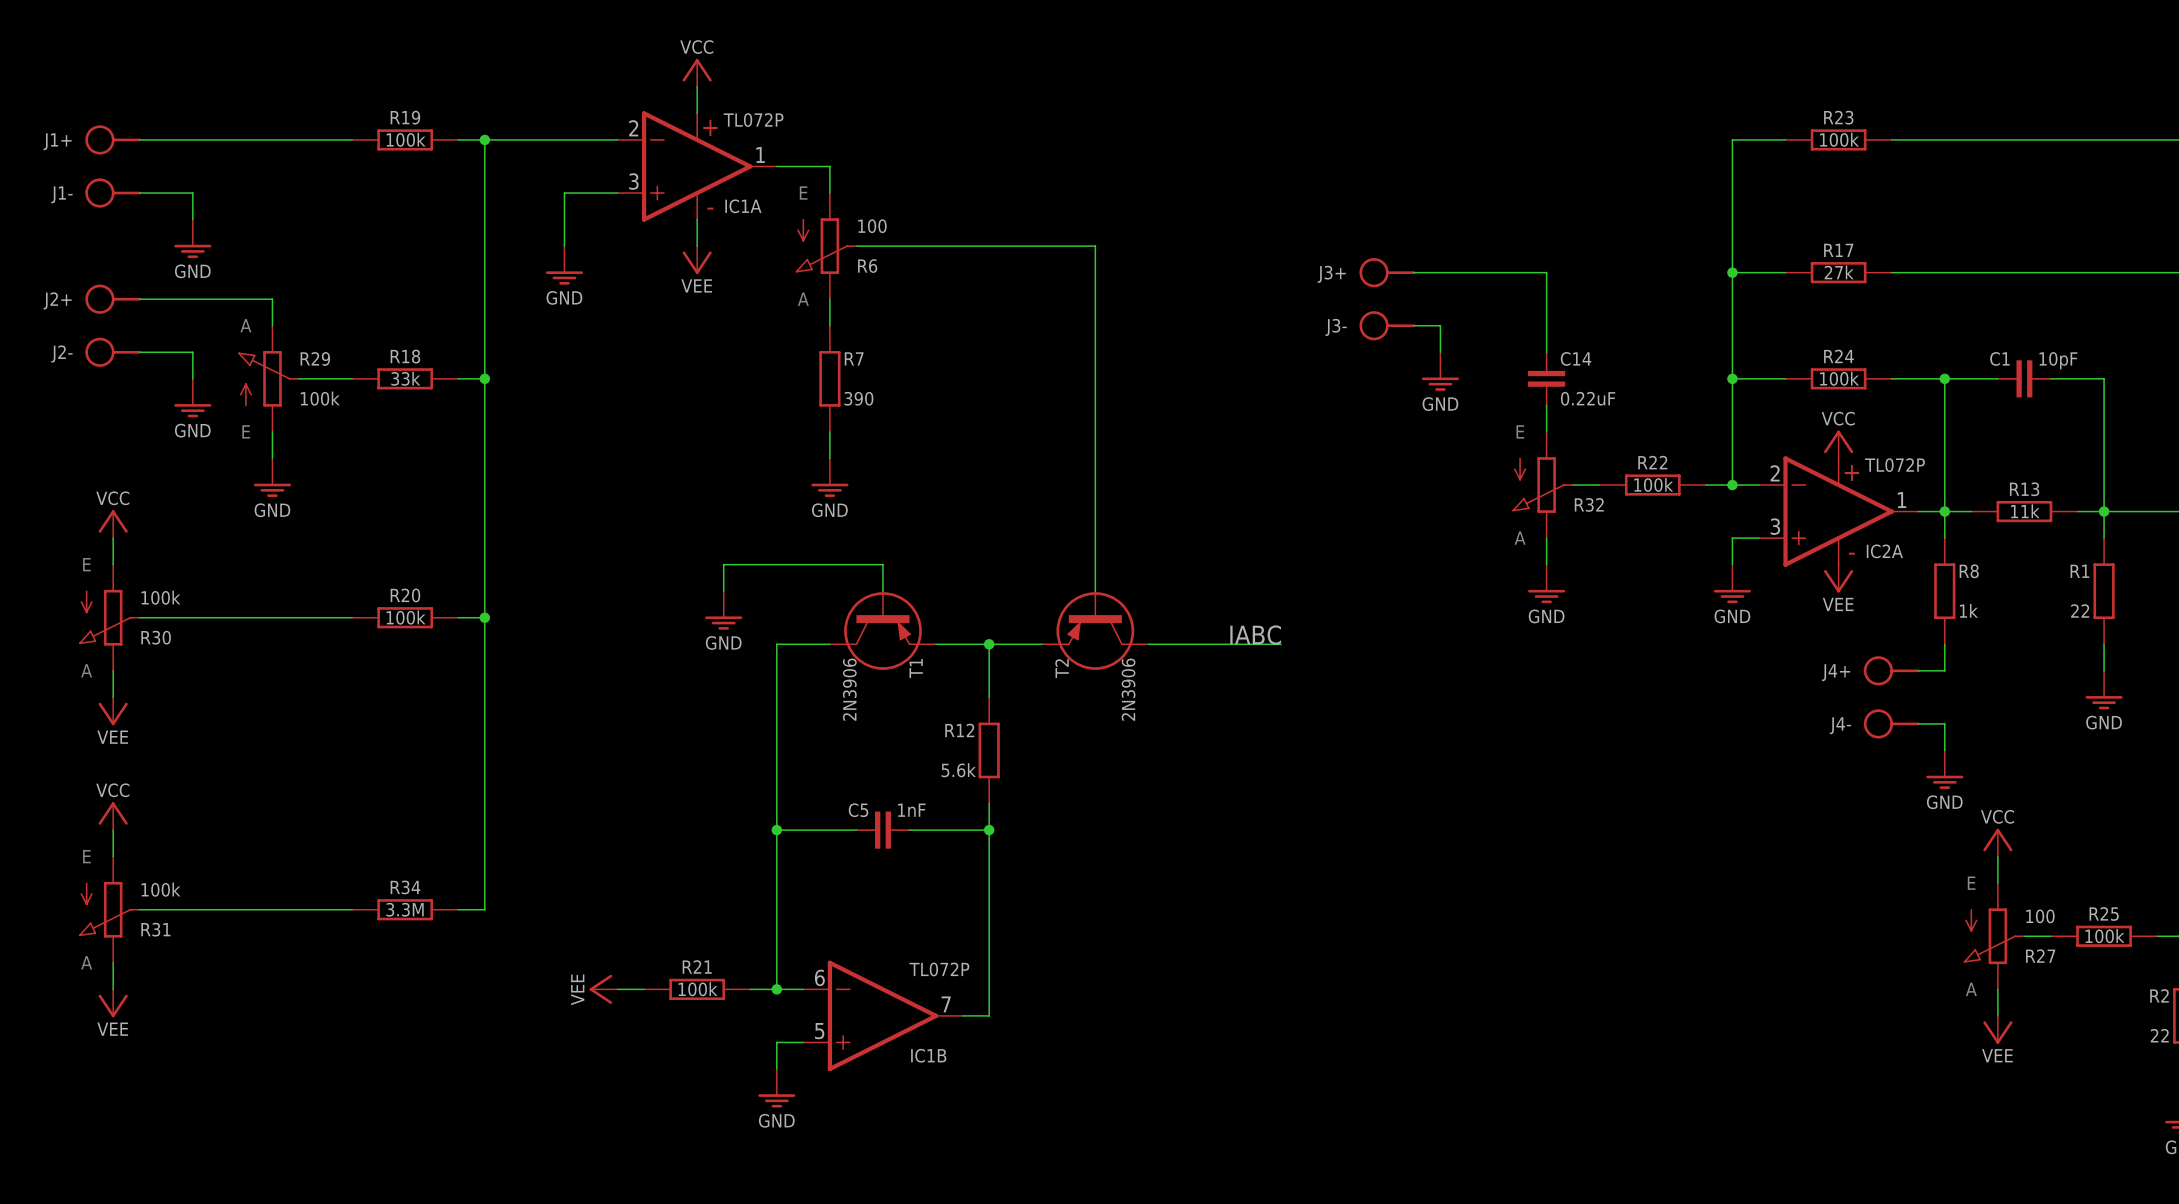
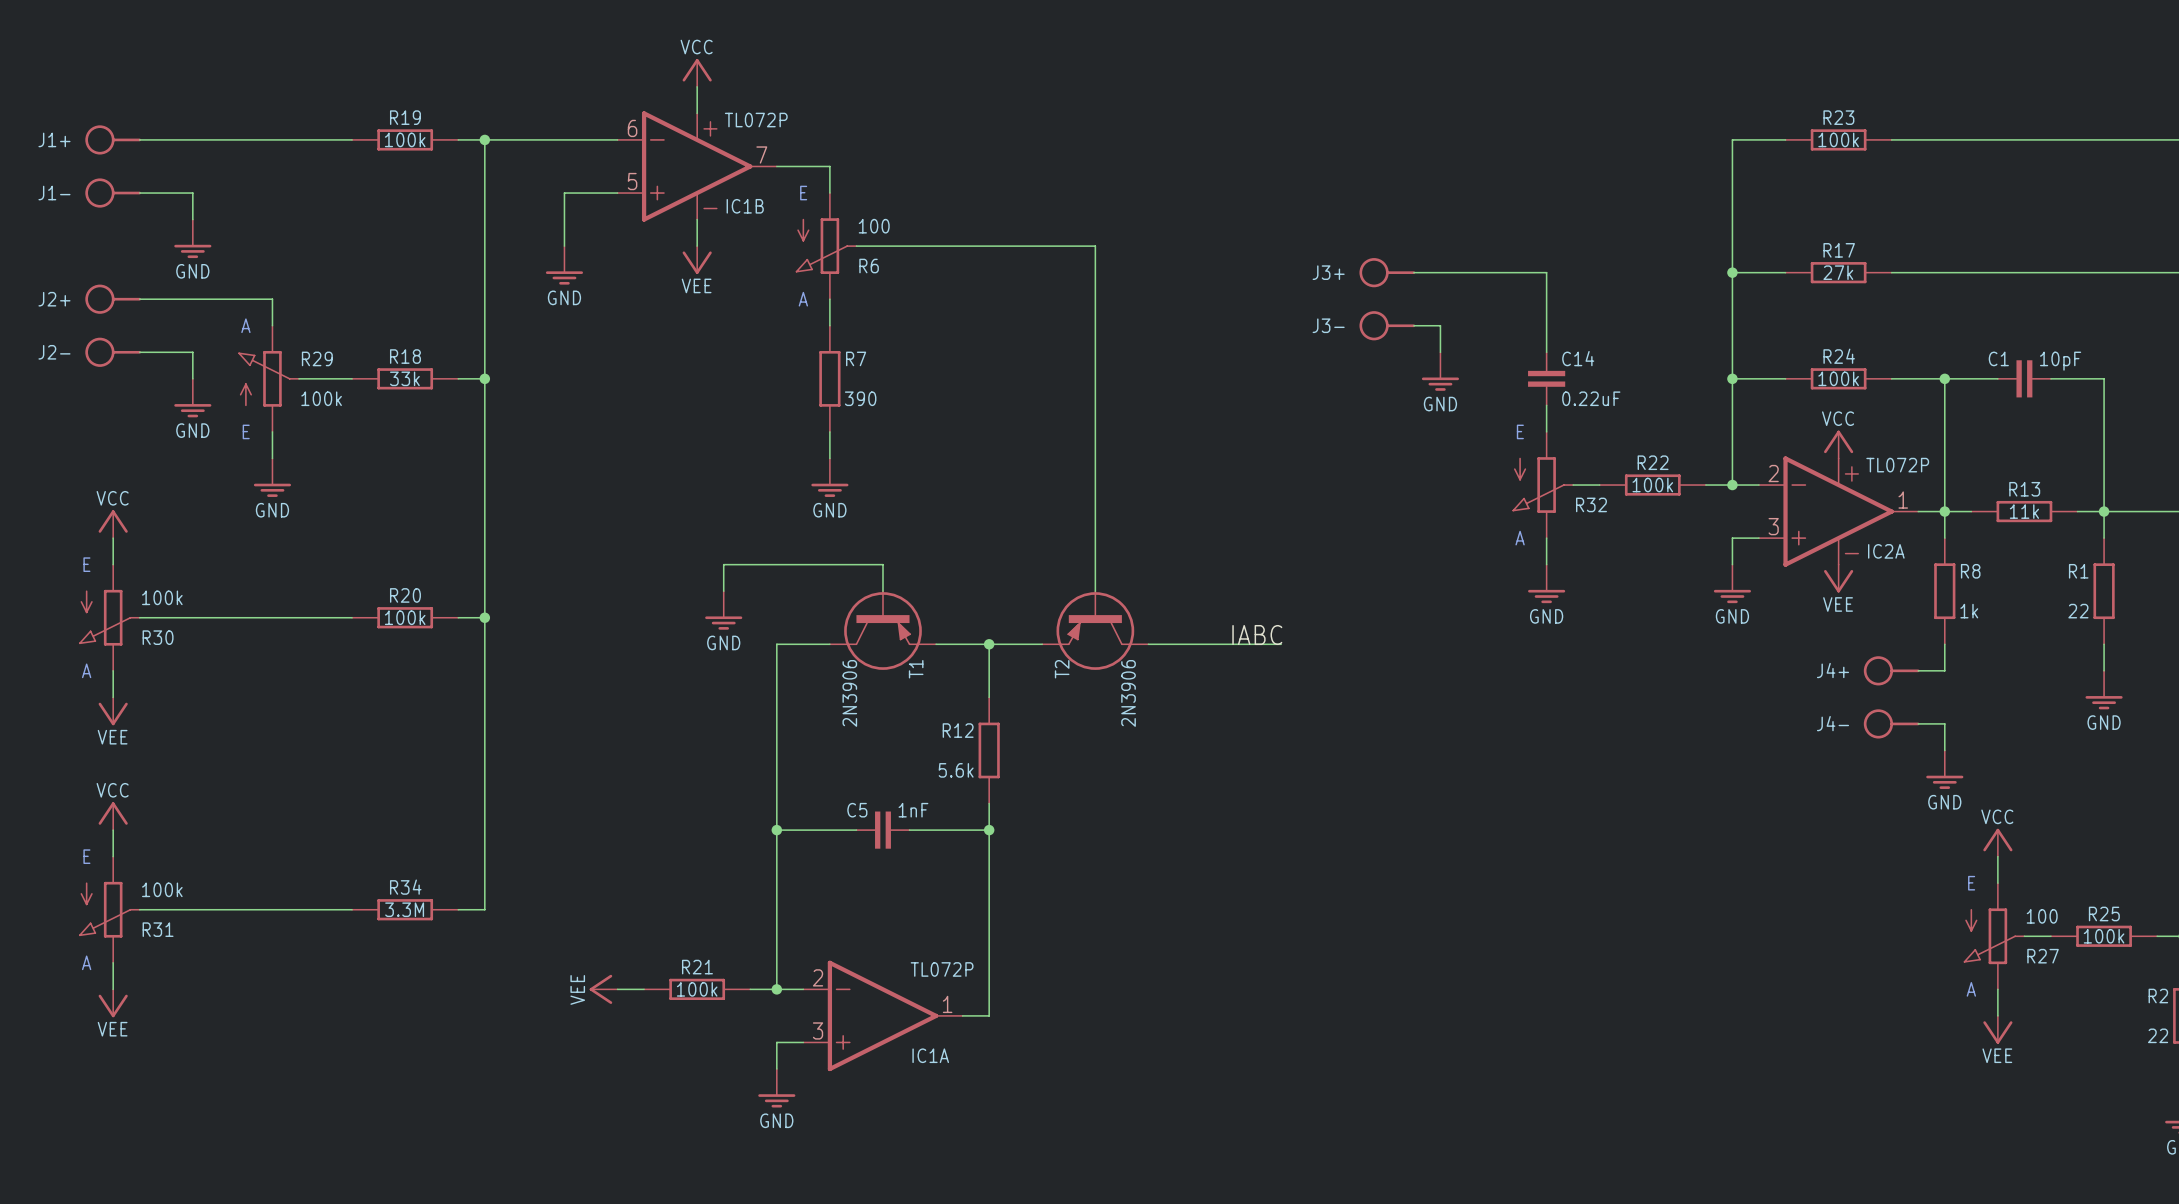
IC1A position: (697, 166) -> (882, 1015)
IC1B position: (882, 1015) -> (697, 166)

